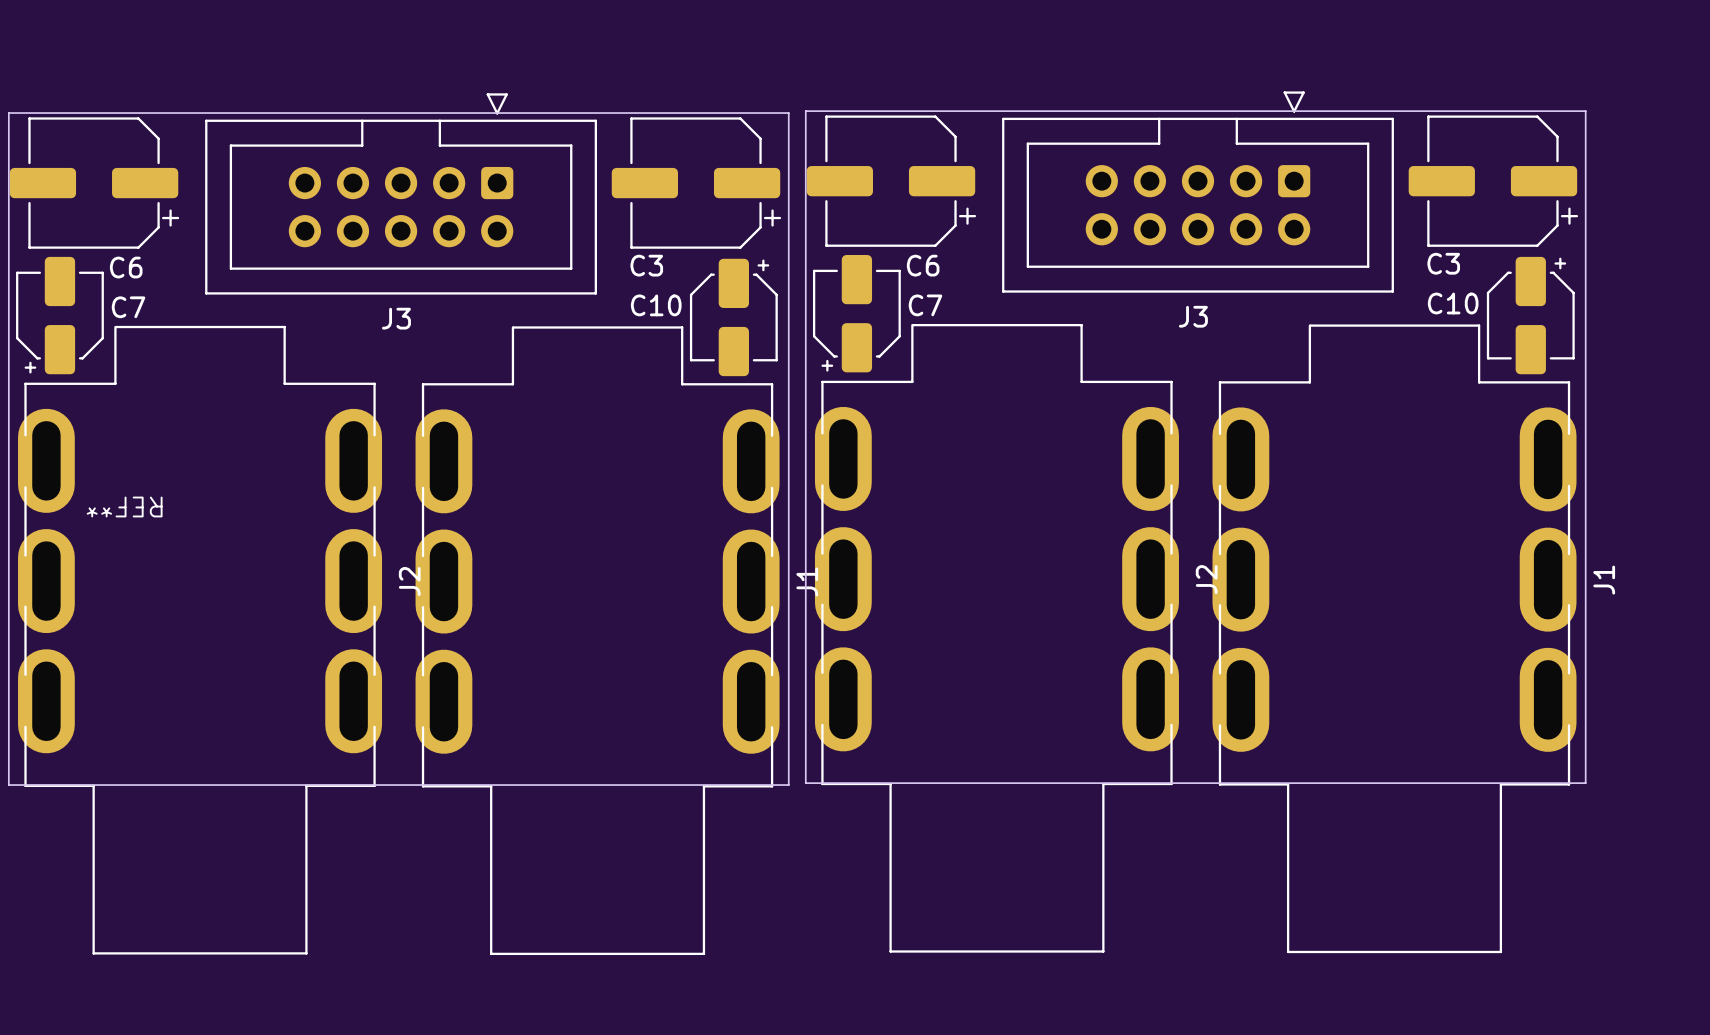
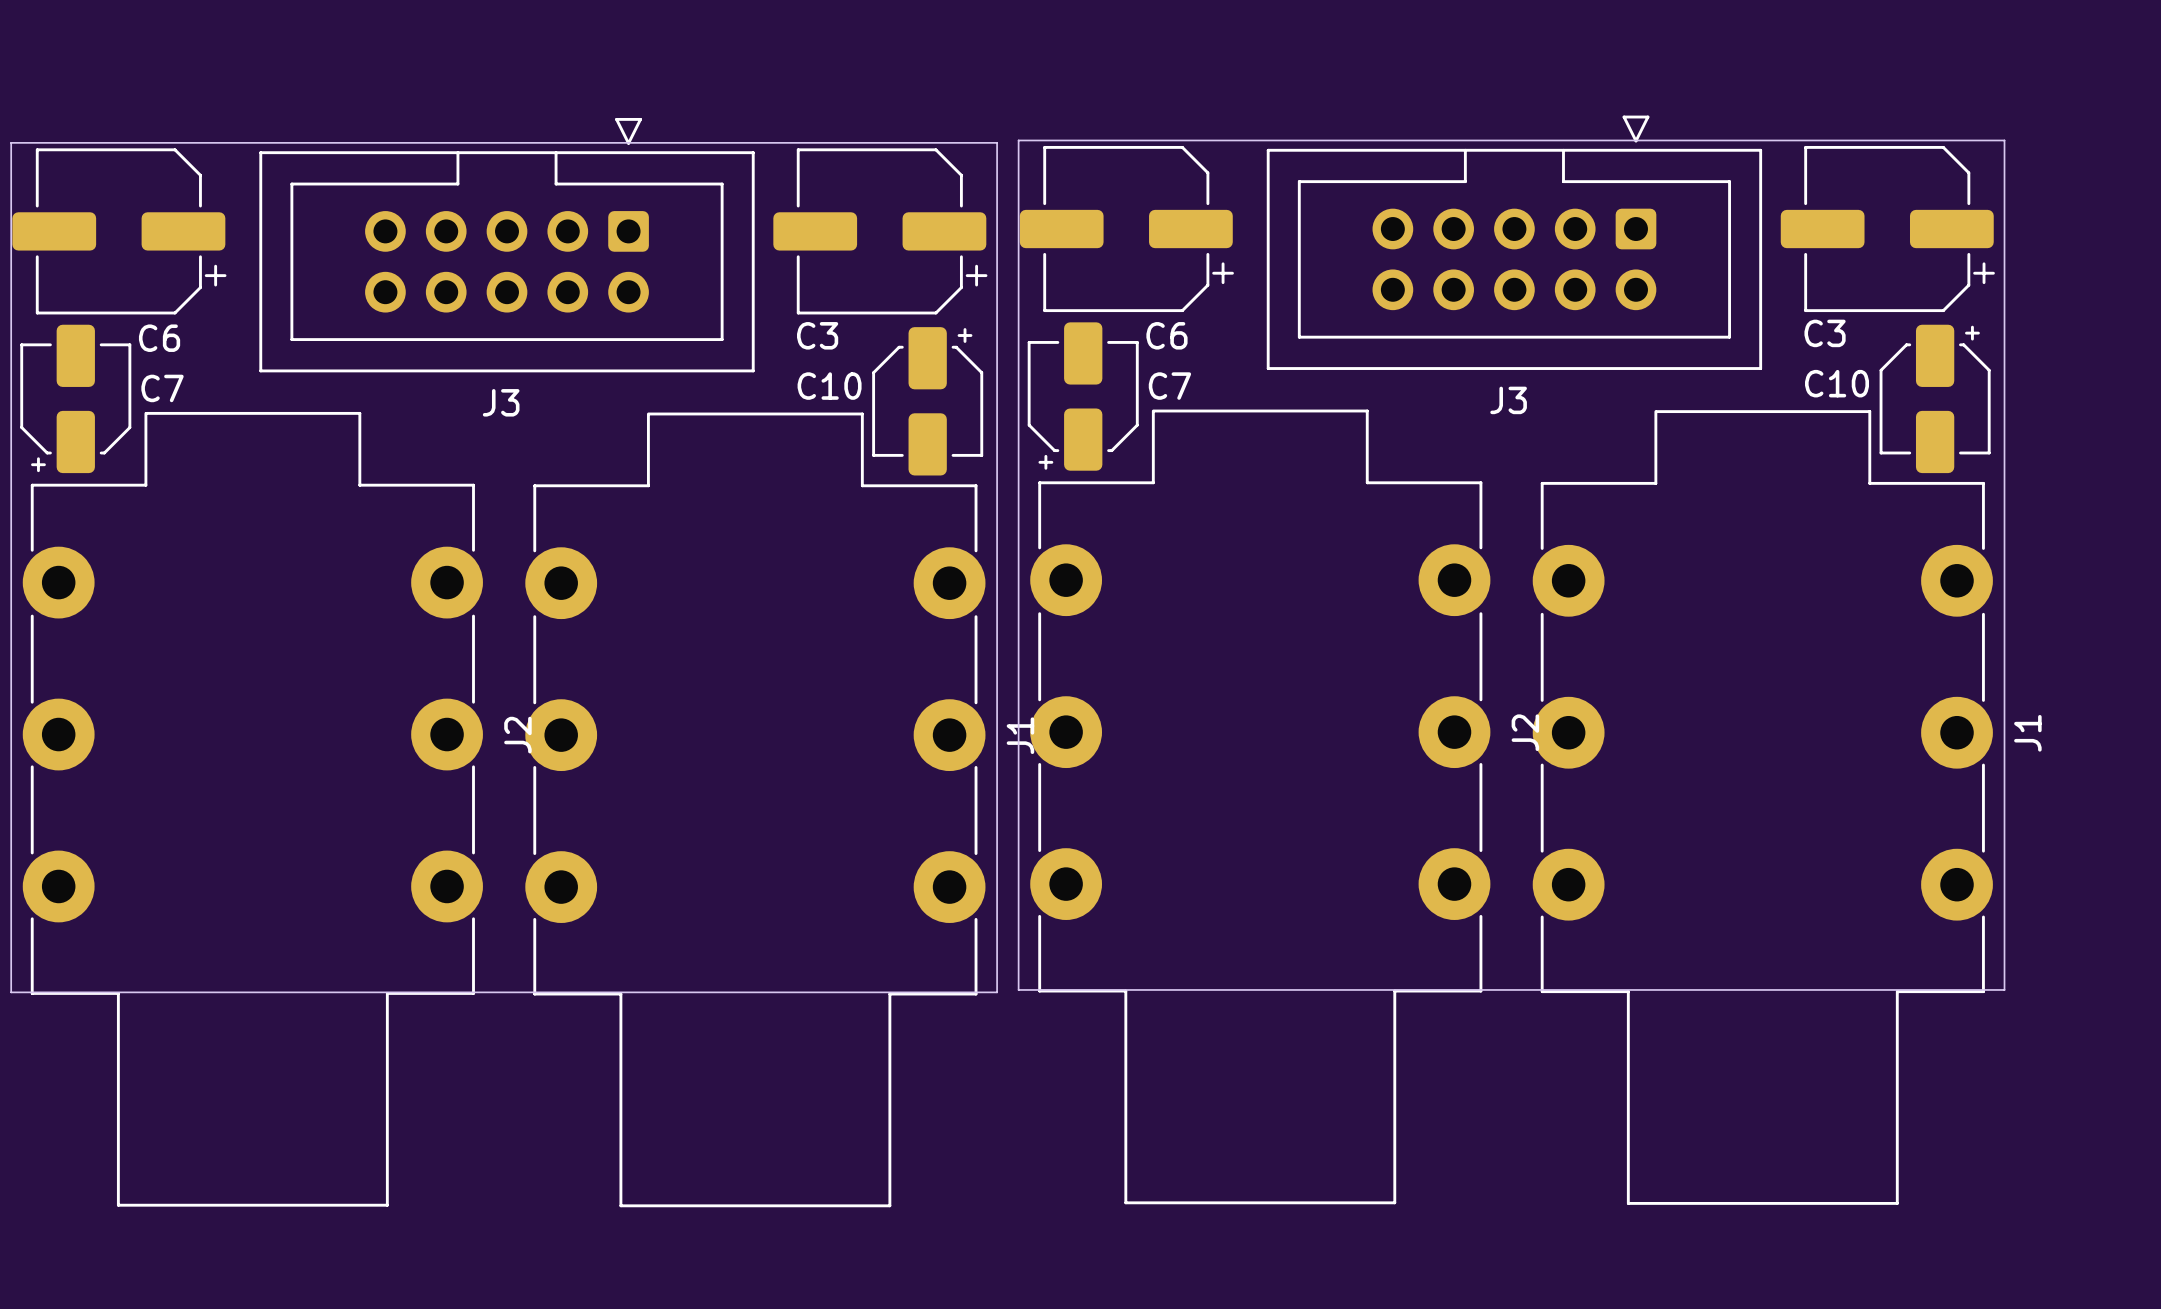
J2 footprint: [814, 323, 1179, 953] -> [1030, 409, 1491, 1205]
J1 footprint: [1212, 324, 1577, 954] -> [1532, 410, 1993, 1205]
J2 footprint: [18, 325, 383, 955] -> [22, 411, 483, 1207]
J1 footprint: [415, 326, 780, 956] -> [525, 412, 986, 1208]
REF**: (124, 506) -> none

